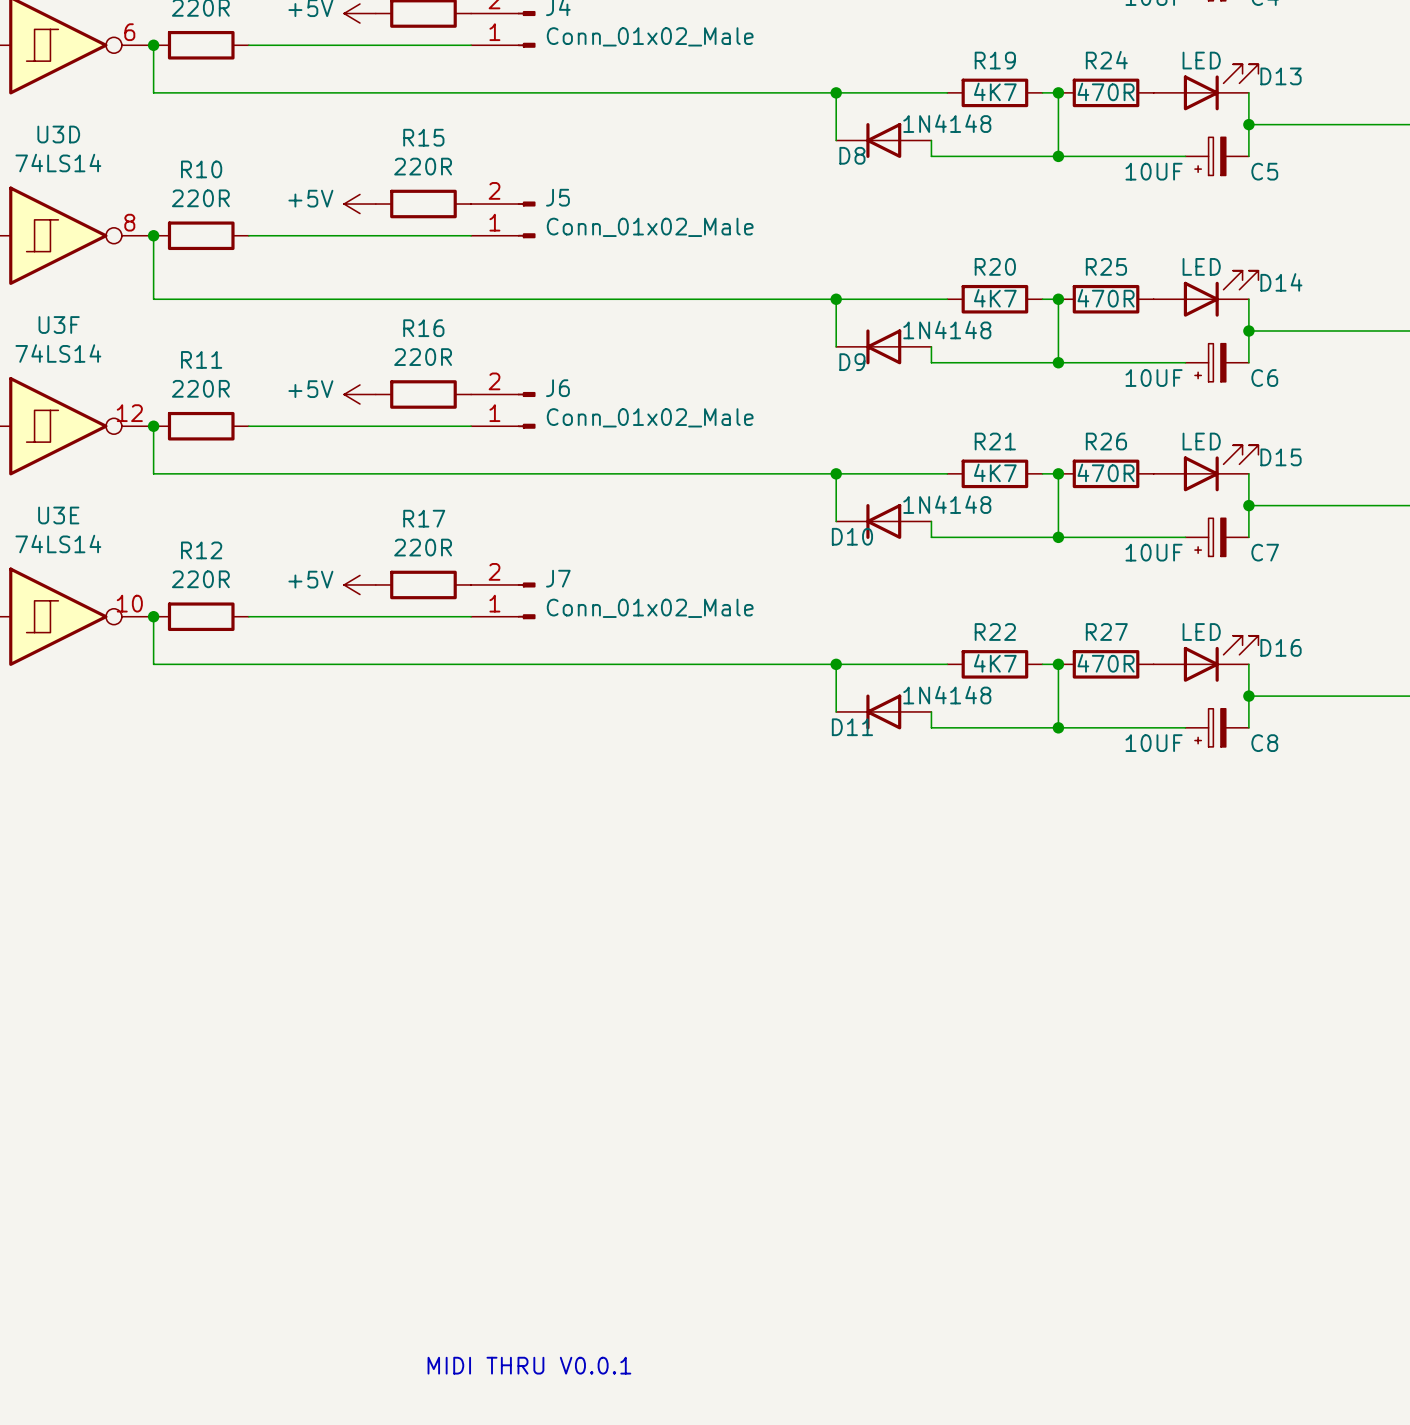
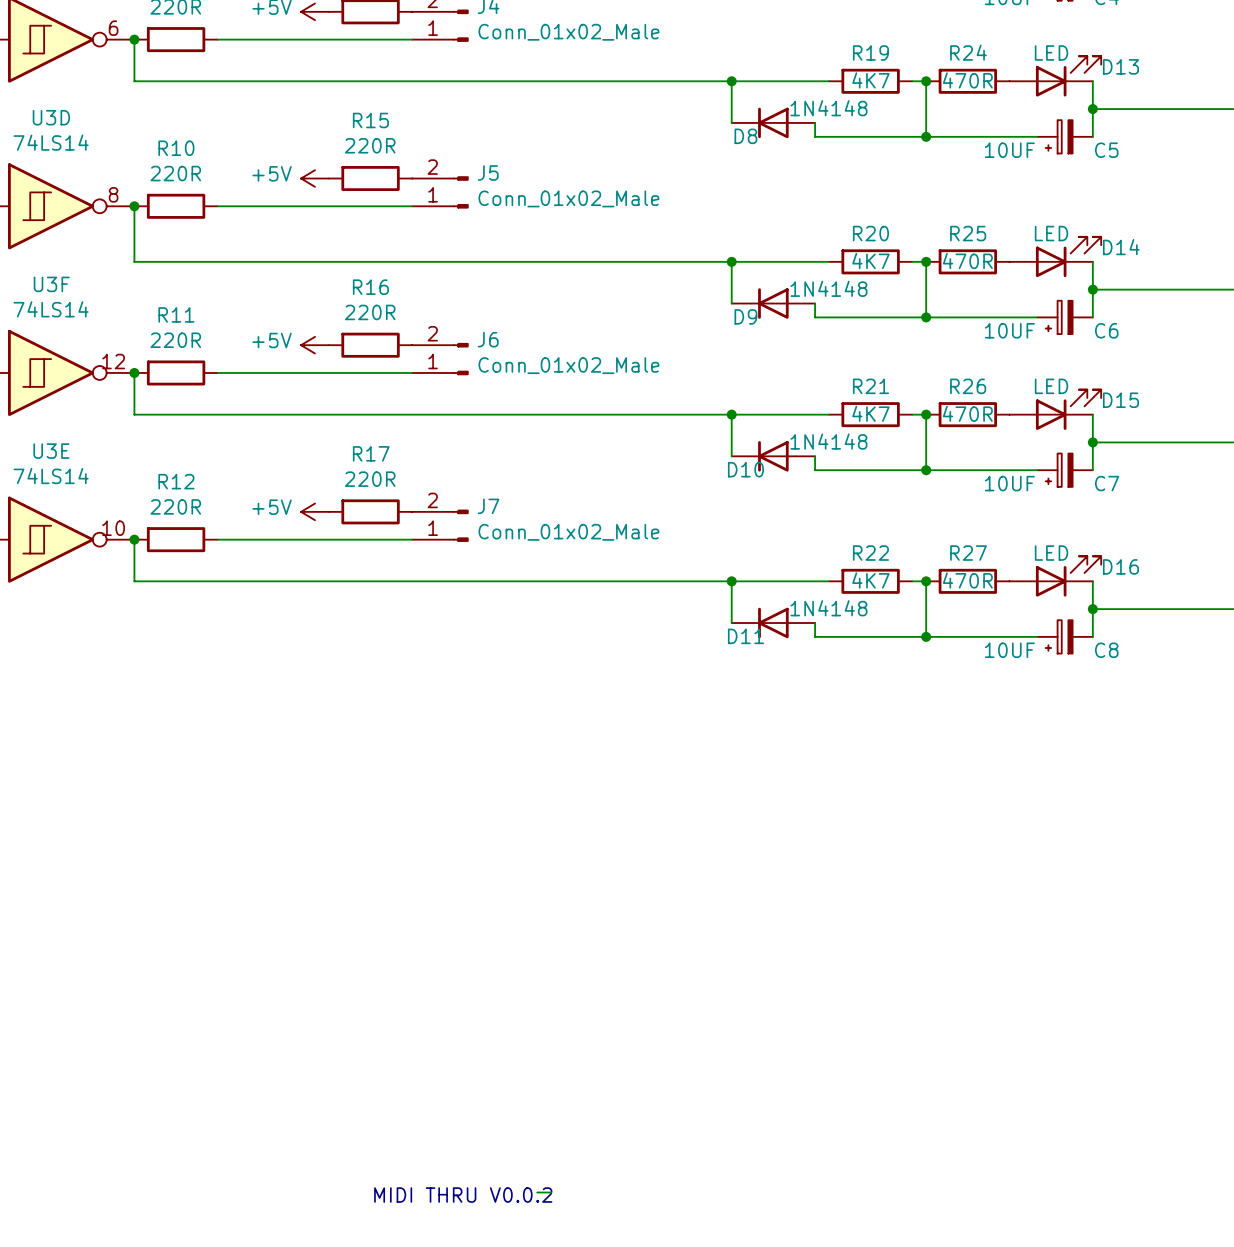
wire: none -> (537, 1192) (551, 1192)
text: MIDI THRU V0.0.1 (529, 1365) -> MIDI THRU V0.0.2 (463, 1195)

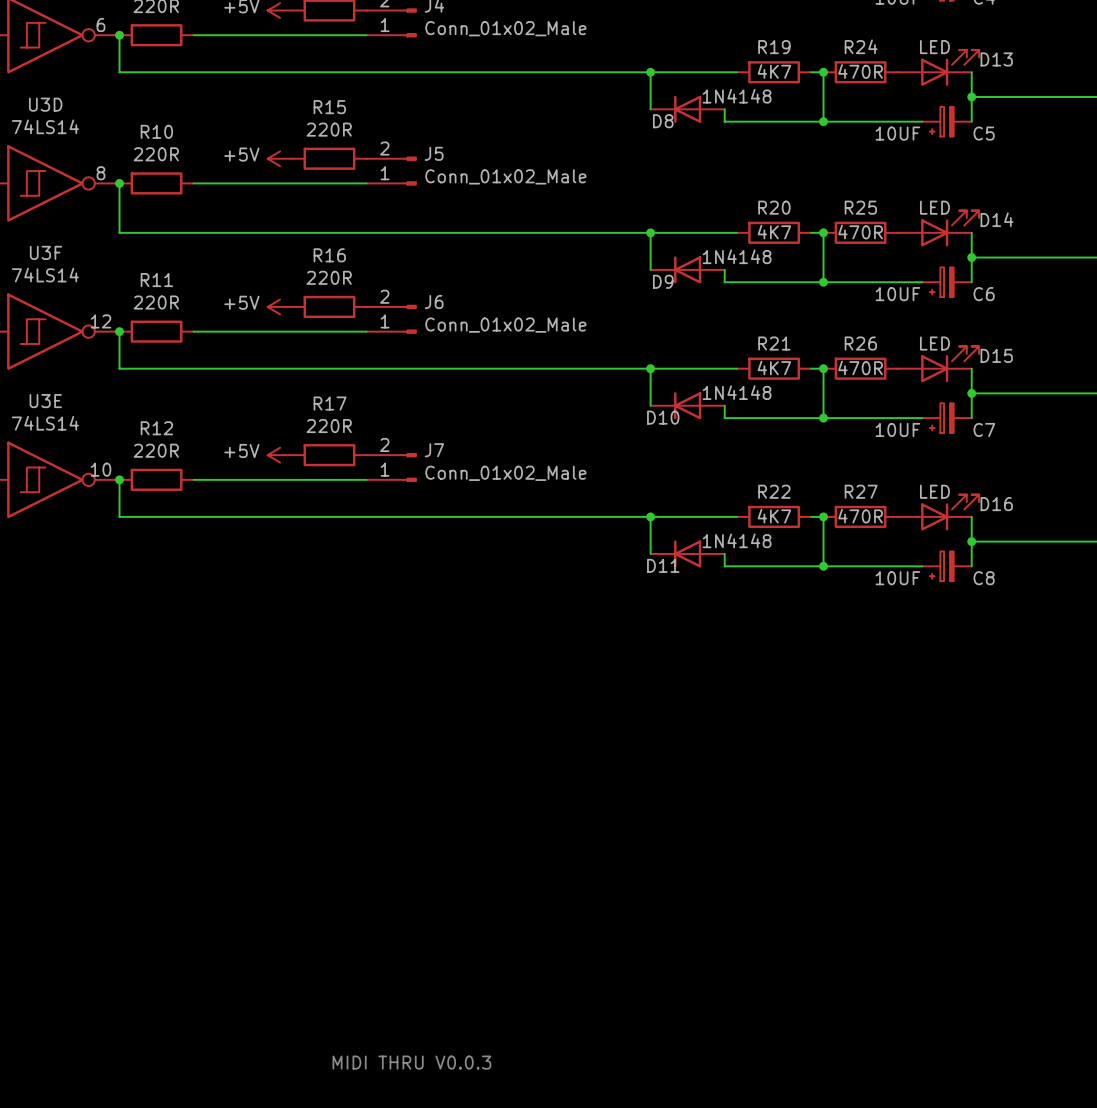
wire: (537, 1192) (551, 1192) -> none
text: MIDI THRU V0.0.2 (463, 1195) -> MIDI THRU V0.0.3 (411, 1062)

